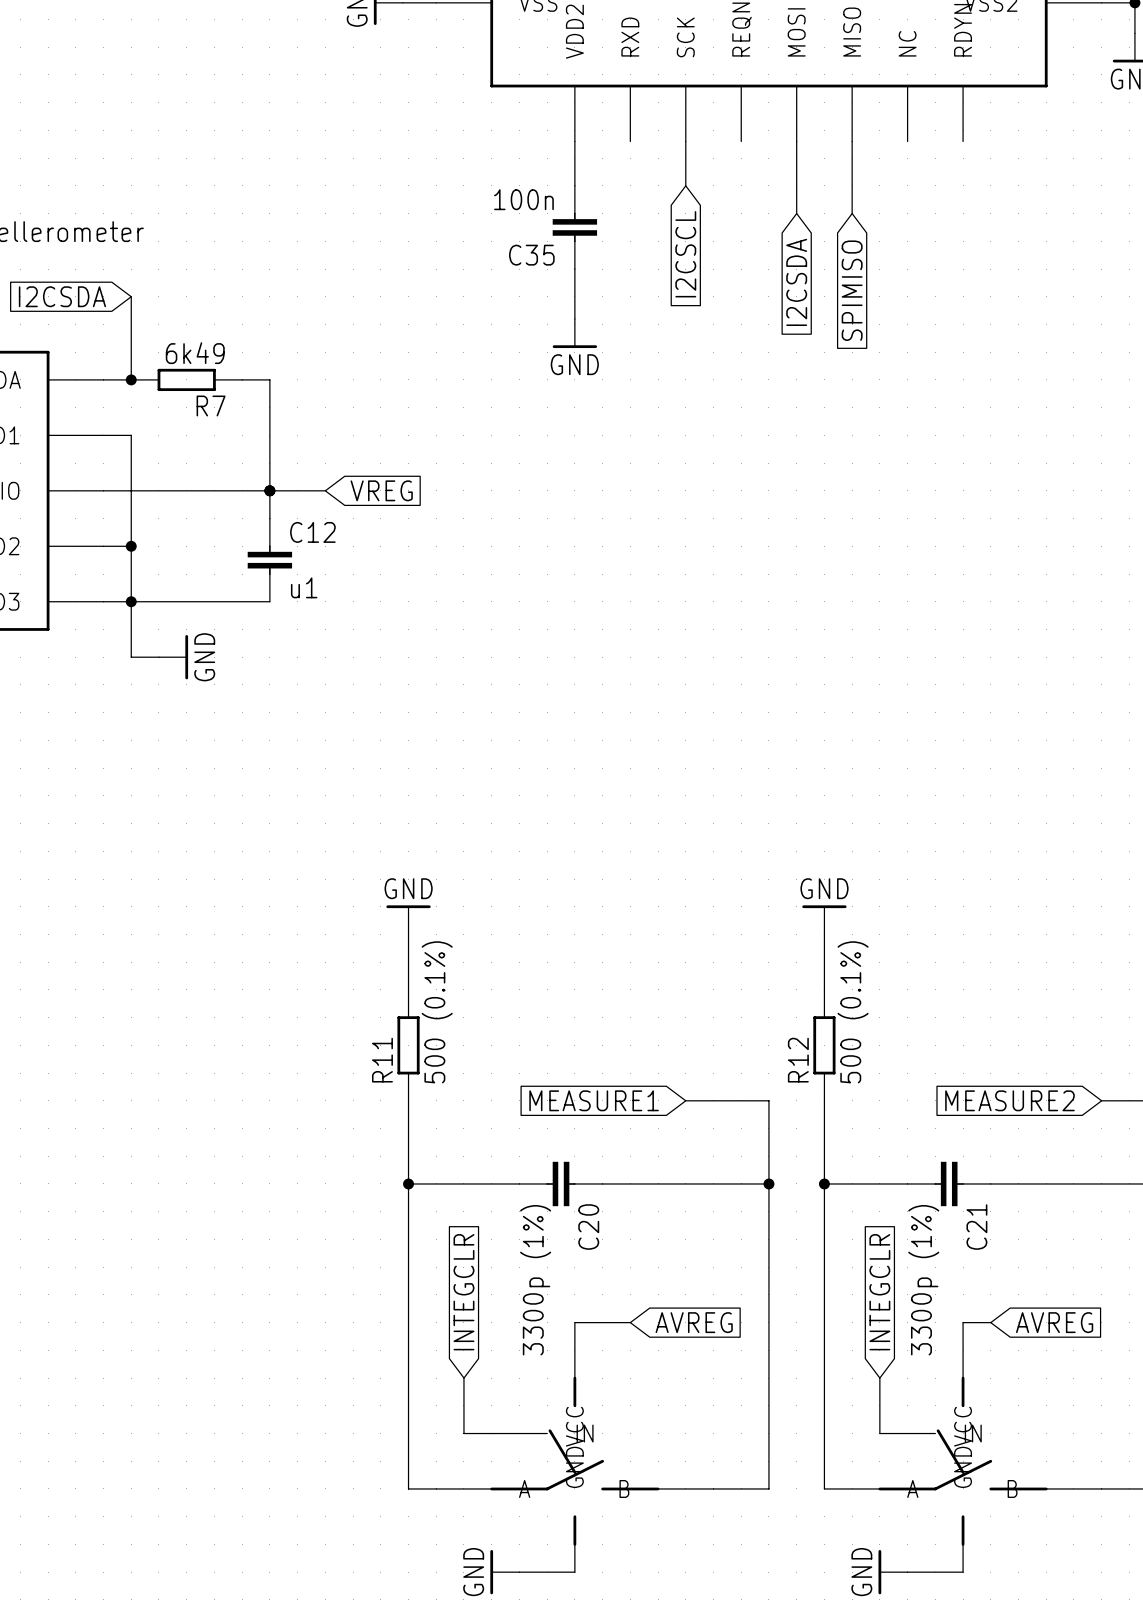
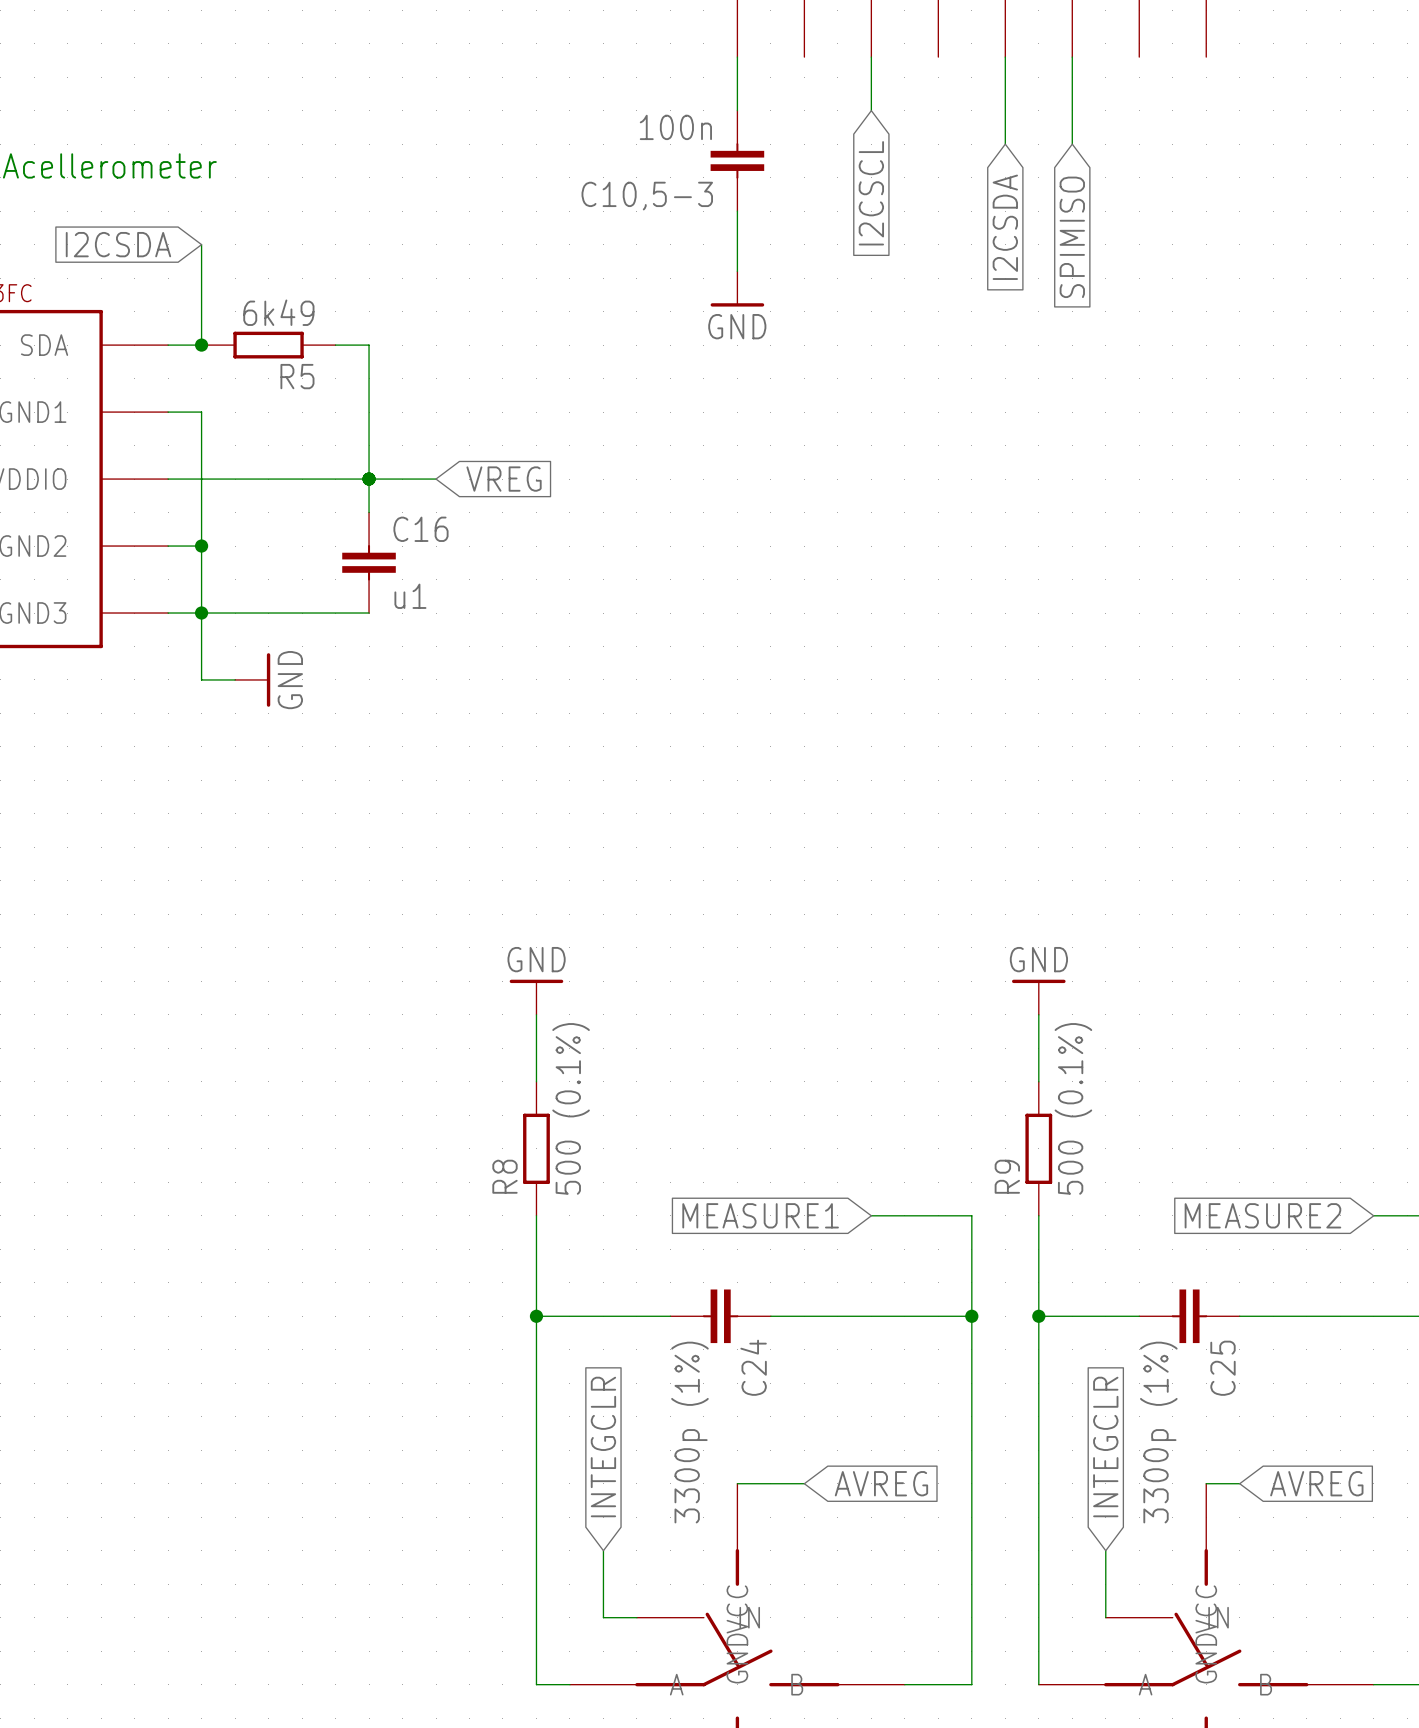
C35 name: C35 (531, 255) -> C10,5-3 (647, 196)
R7 name: R7 (211, 405) -> R5 (297, 376)
C12 name: C12 (312, 532) -> C16 (420, 529)
R11 name: R11 (382, 1060) -> R8 (504, 1176)
R12 name: R12 (798, 1060) -> R9 (1007, 1176)
C20 name: C20 (588, 1227) -> C24 (753, 1367)
C21 name: C21 (976, 1227) -> C25 (1222, 1368)

